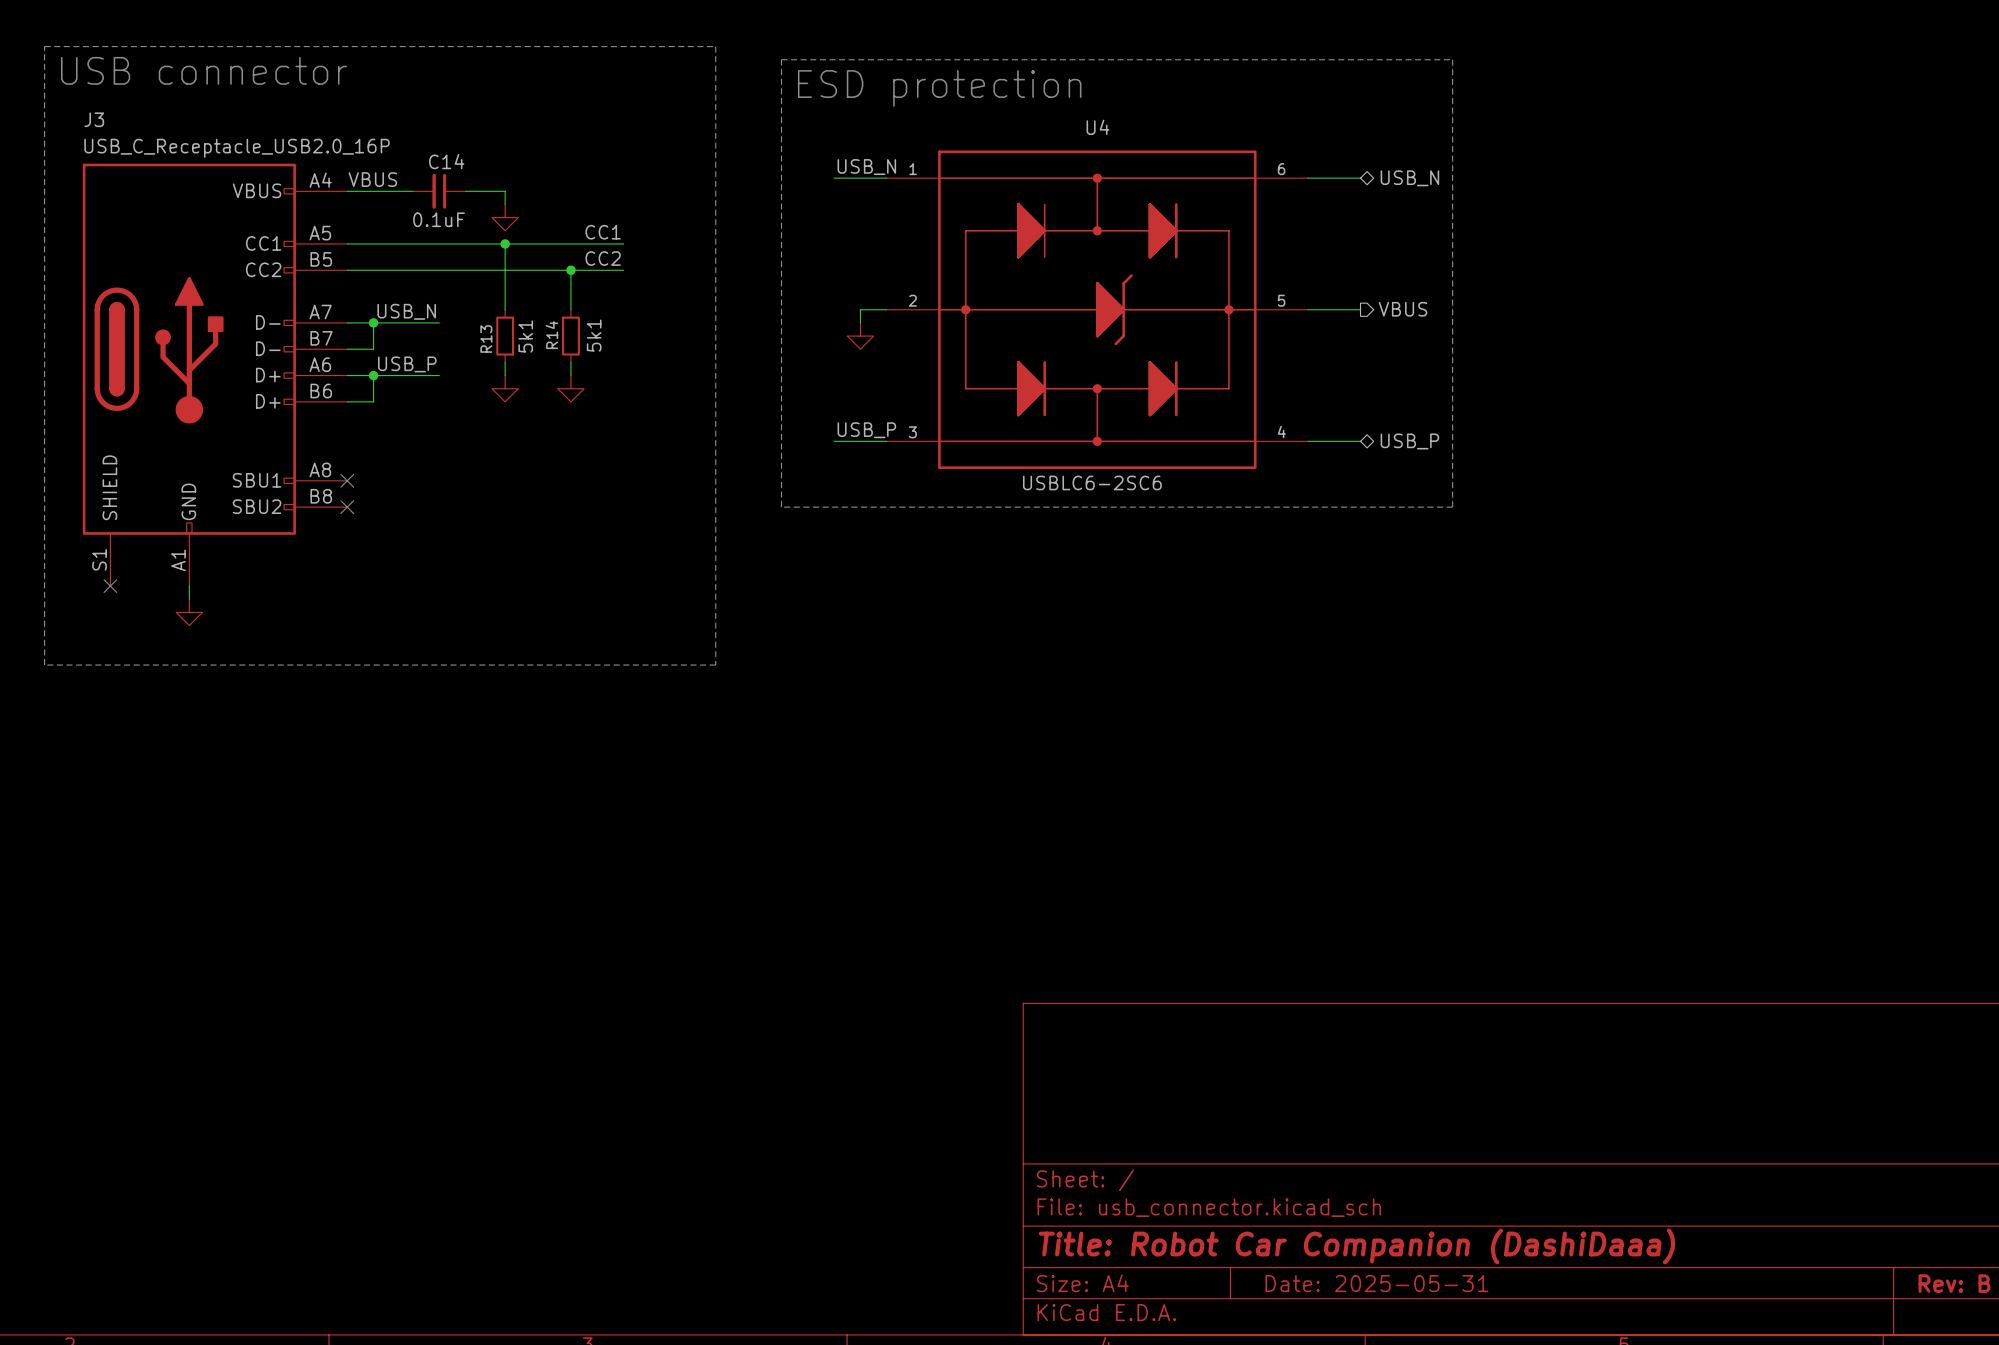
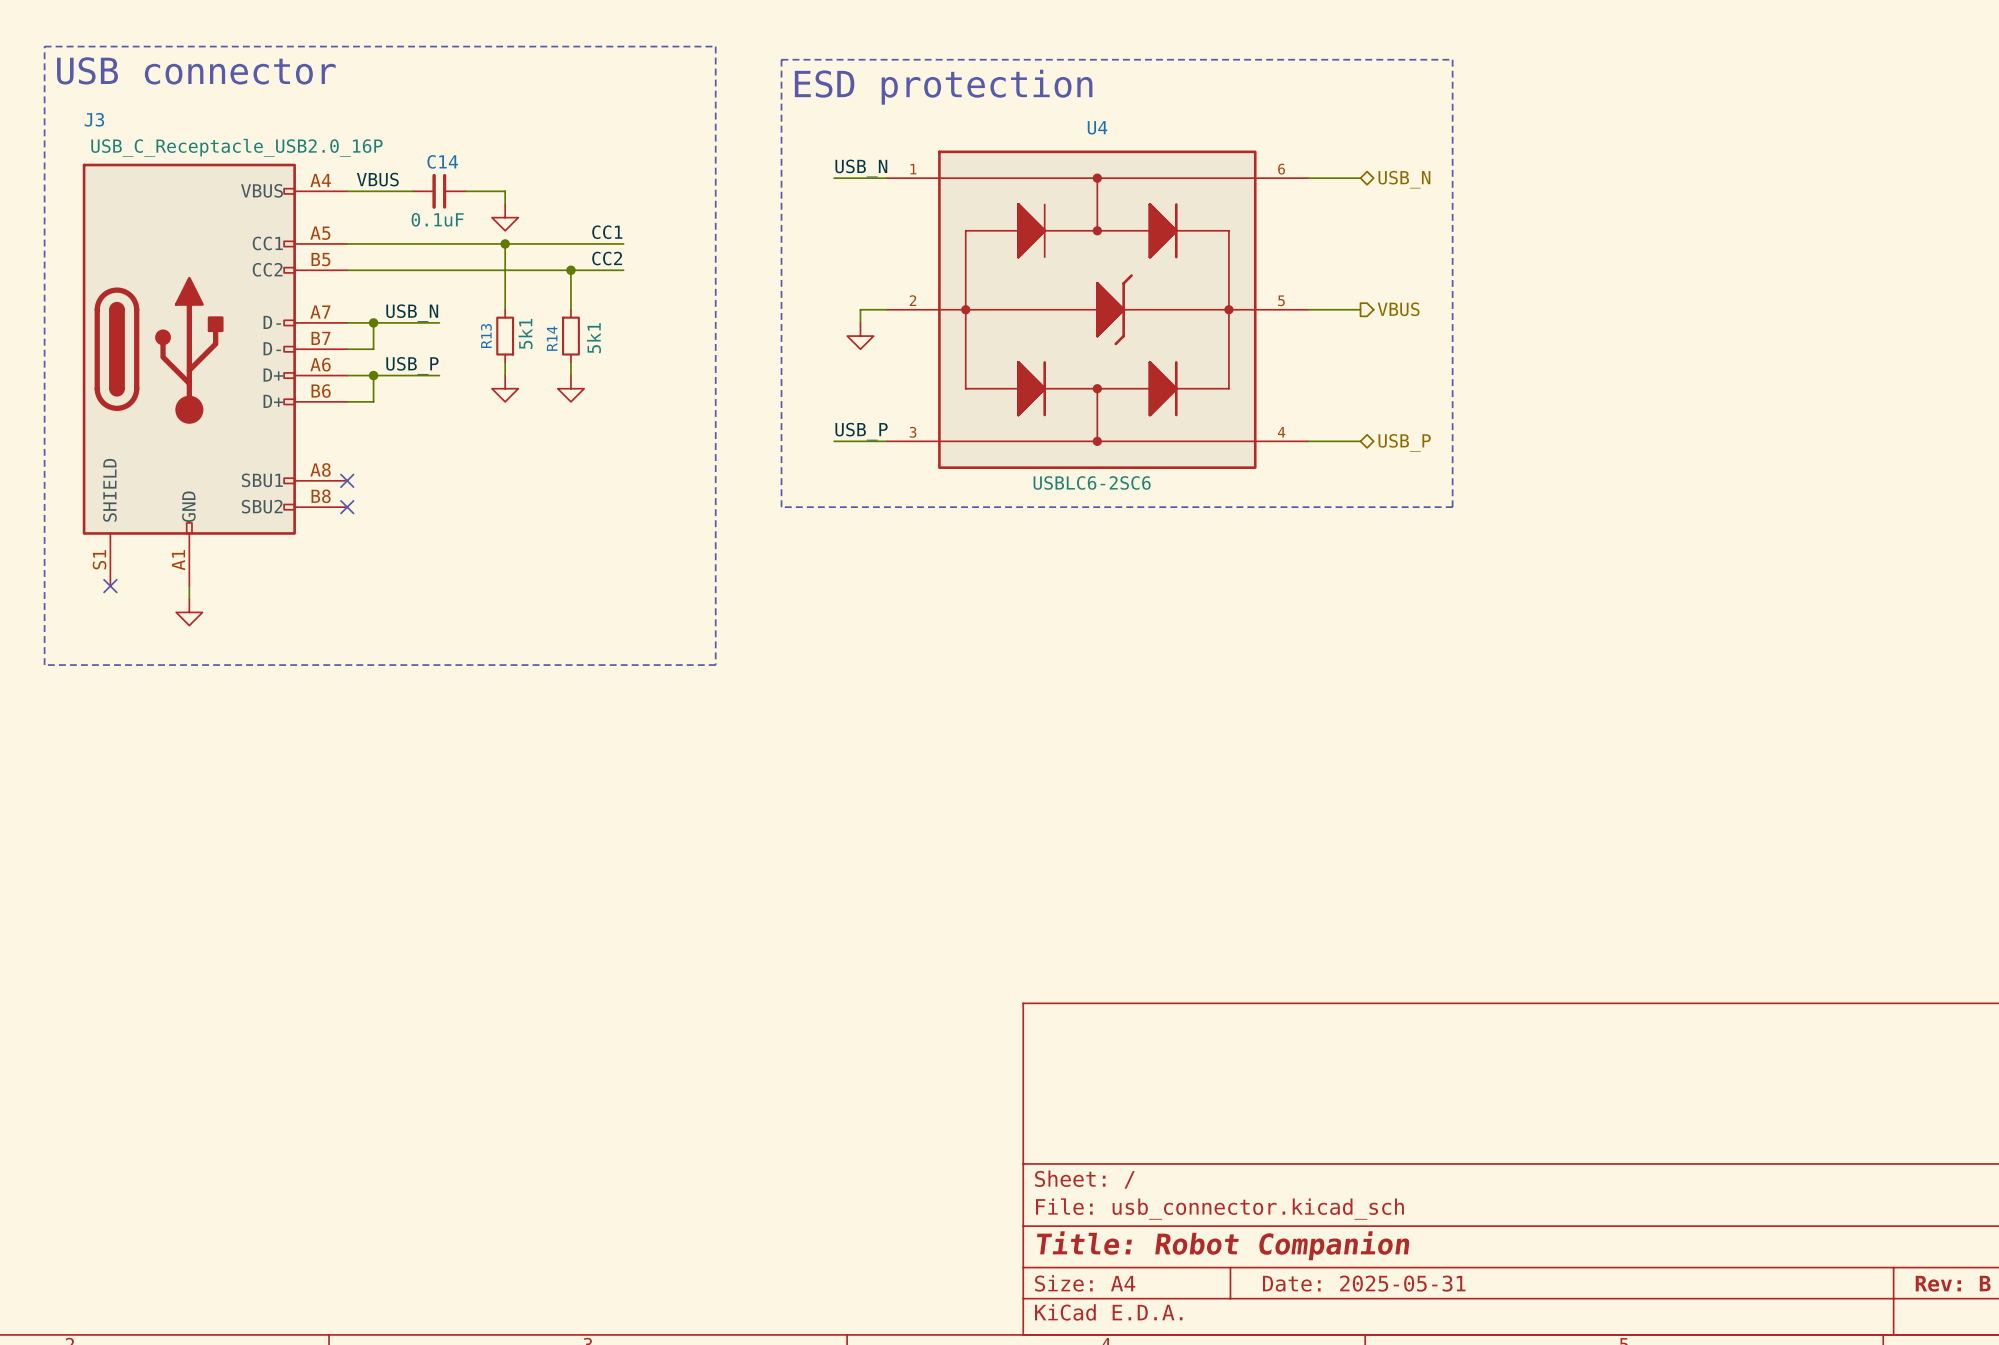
title block: Title: Robot Car Companion (DashiDaaa) (1356, 1246) -> Title: Robot Companion (1223, 1245)

